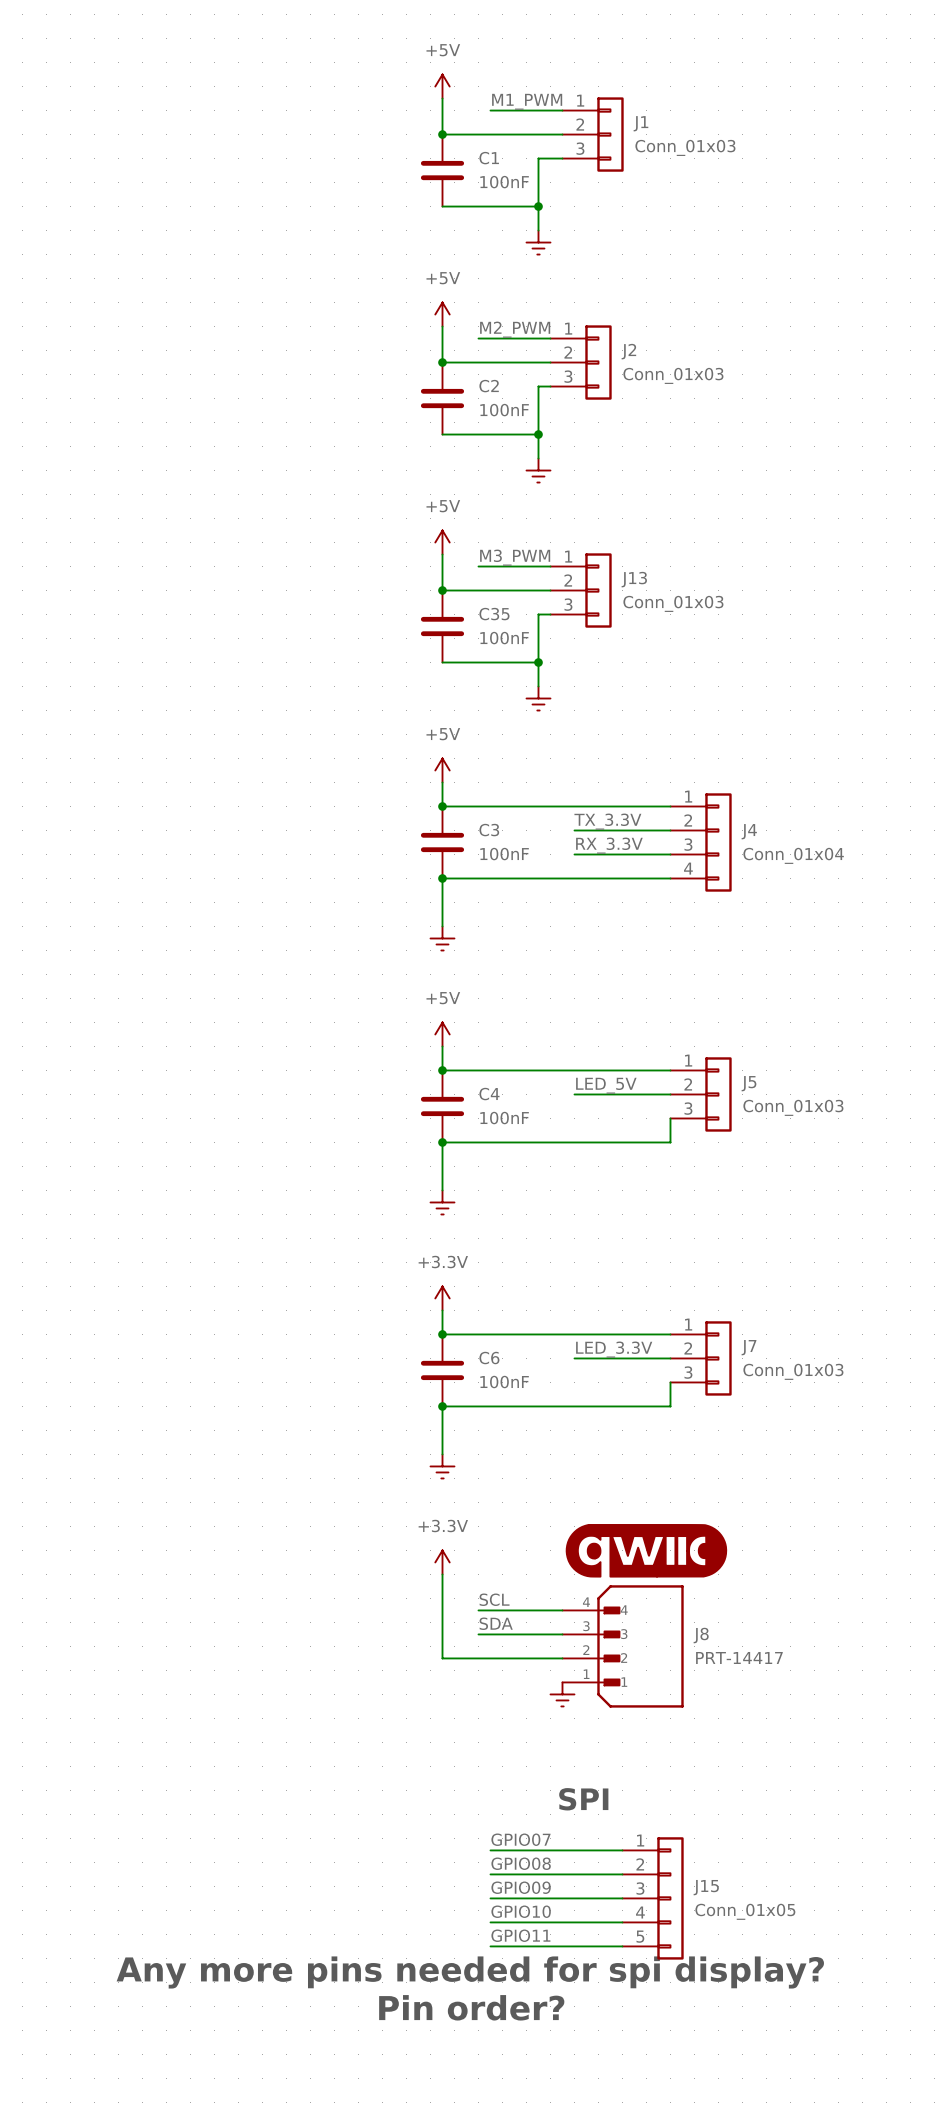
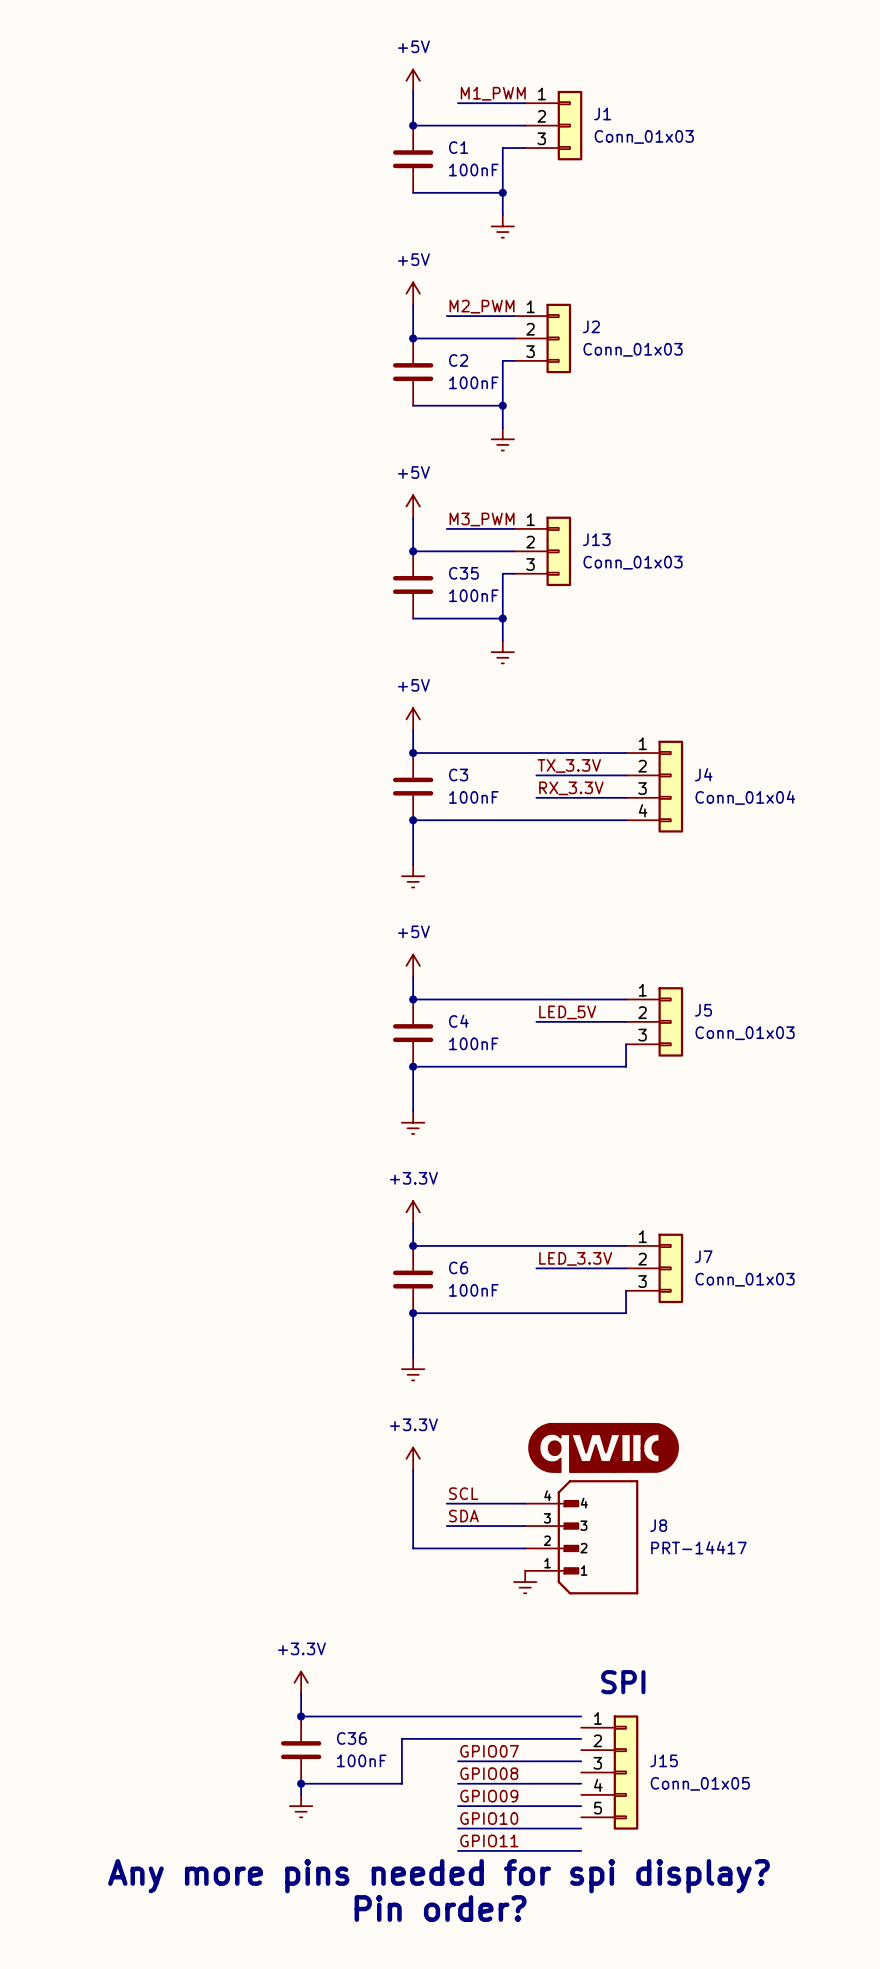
text position: SPI (583, 1799) -> SPI (623, 1682)
power symbol: none -> +3.3V (301, 1682)
wire: none -> (301, 1694) (301, 1716) (581, 1716)
junction: none -> (301, 1716)
label position: GPIO07 (520, 1839) -> GPIO07 (489, 1751)
wire: (490, 1850) (622, 1850) -> (457, 1761) (581, 1761)
wire: none -> (581, 1738) (401, 1738) (401, 1783) (301, 1783) (301, 1794)
label position: GPIO08 (521, 1863) -> GPIO08 (489, 1773)
C36: none -> 100nF (301, 1750)
wire: (490, 1874) (622, 1874) -> (457, 1783) (581, 1783)
label position: GPIO09 (521, 1887) -> GPIO09 (489, 1796)
wire: (490, 1898) (622, 1898) -> (457, 1806) (581, 1806)
junction: none -> (301, 1783)
label position: GPIO10 (521, 1911) -> GPIO10 (489, 1818)
wire: (490, 1922) (622, 1922) -> (457, 1828) (581, 1828)
power symbol: none -> (301, 1806)
label position: GPIO11 (520, 1935) -> GPIO11 (489, 1840)
wire: (490, 1946) (622, 1946) -> (457, 1850) (581, 1850)
text position: Any more pins needed for spi display? (470, 1972) -> Any more pins needed for spi display? (438, 1876)
text position: Pin order? (471, 2007) -> Pin order? (440, 1908)

